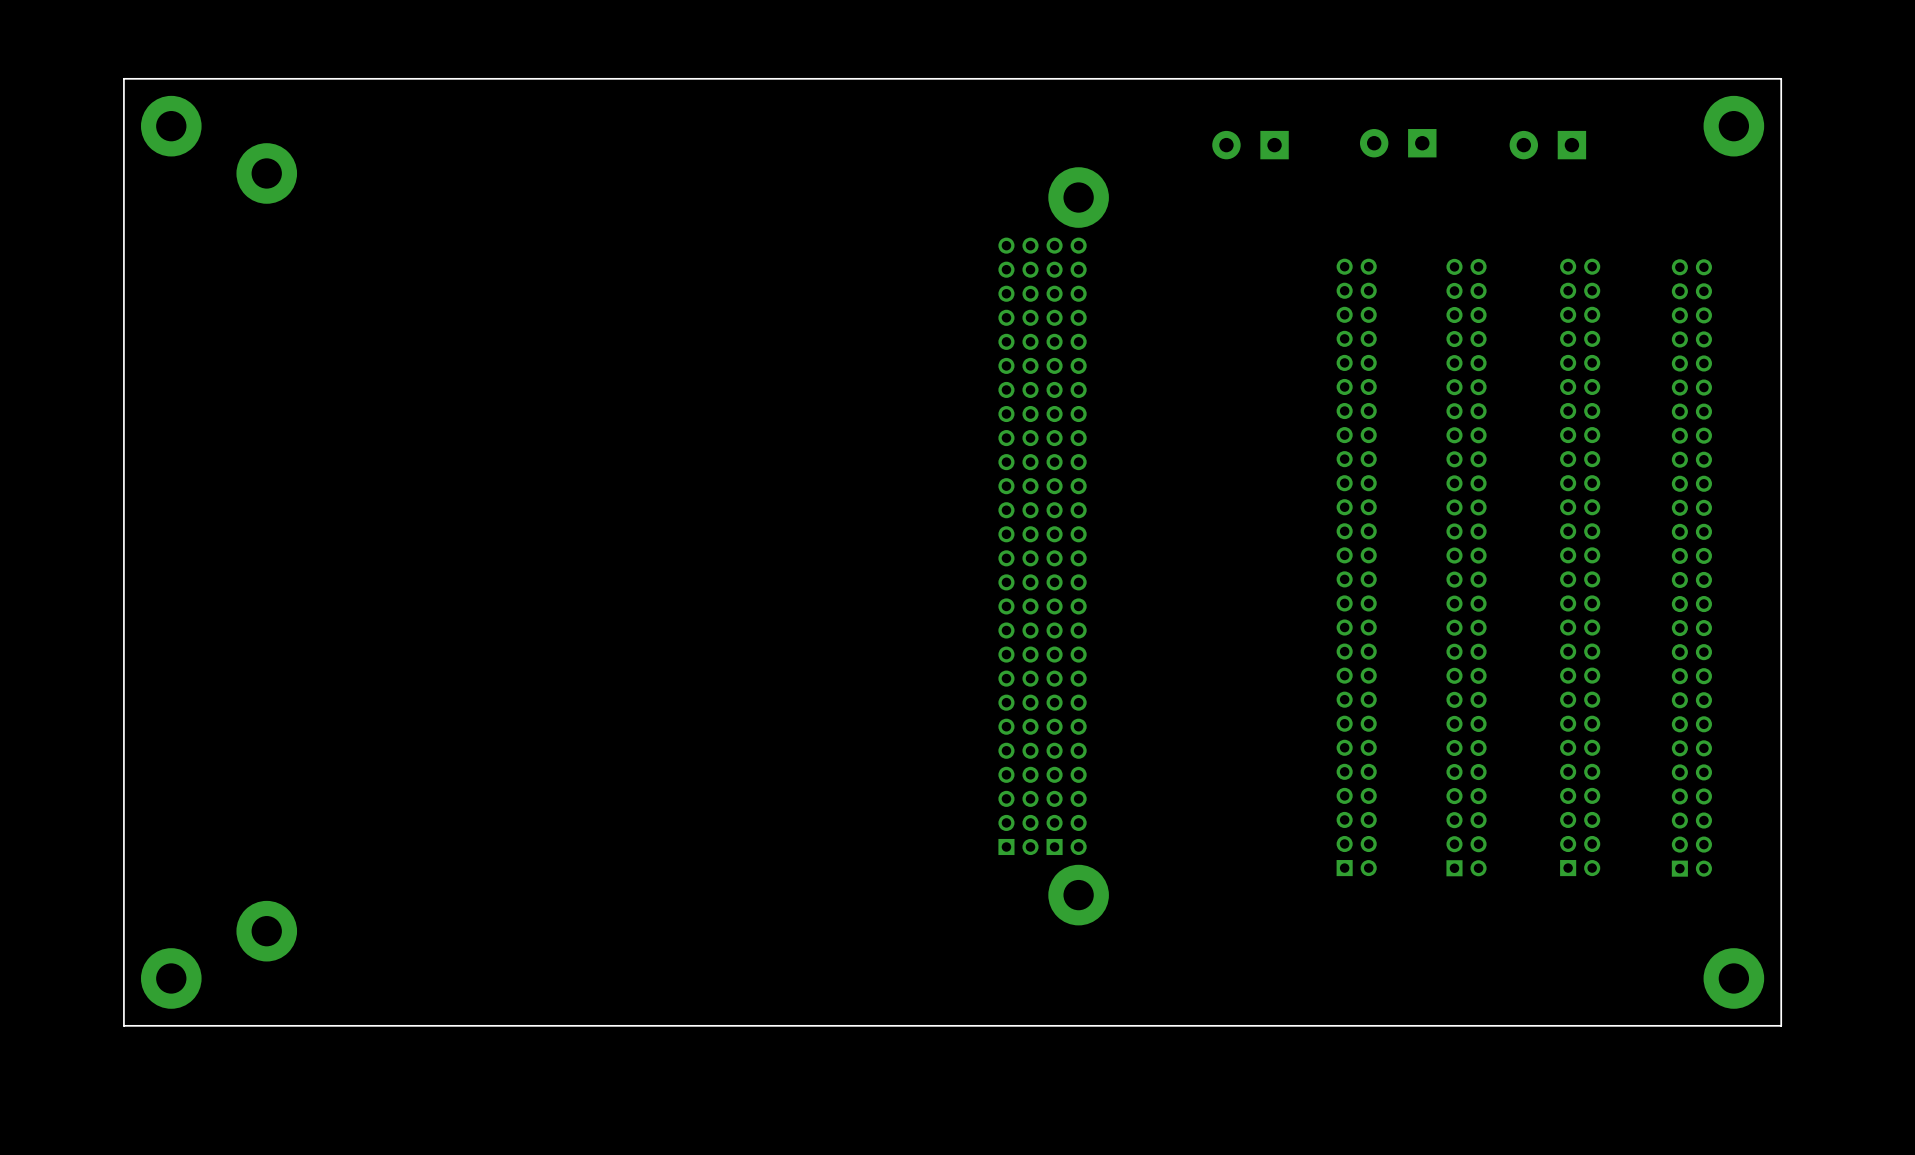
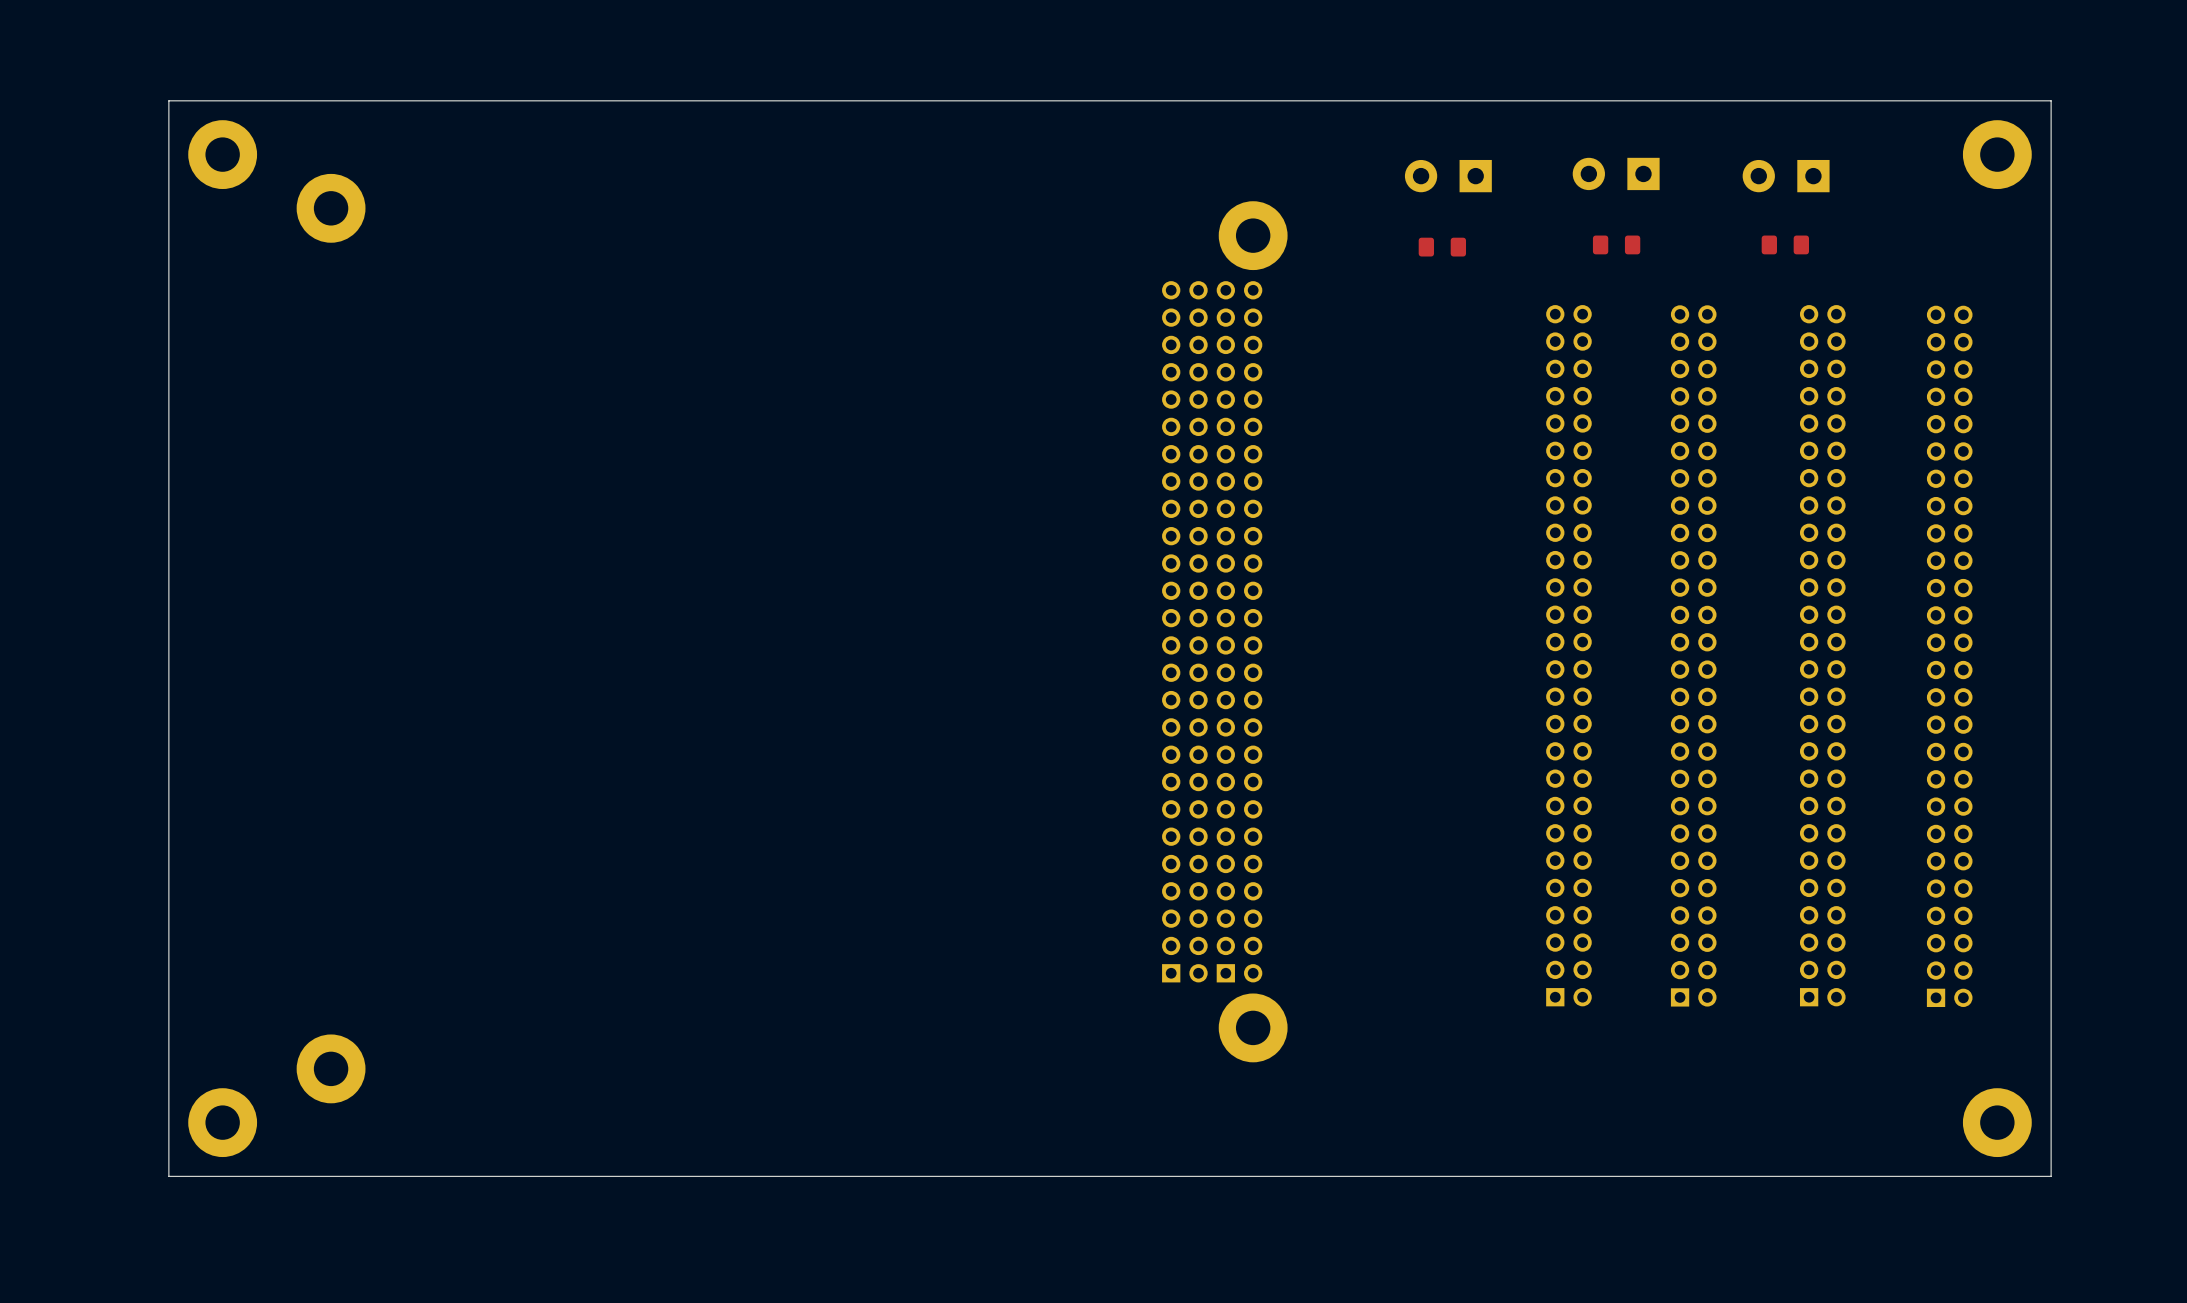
part: none -> (1616, 244)
part: none -> (1785, 244)
part: none -> (1442, 247)

